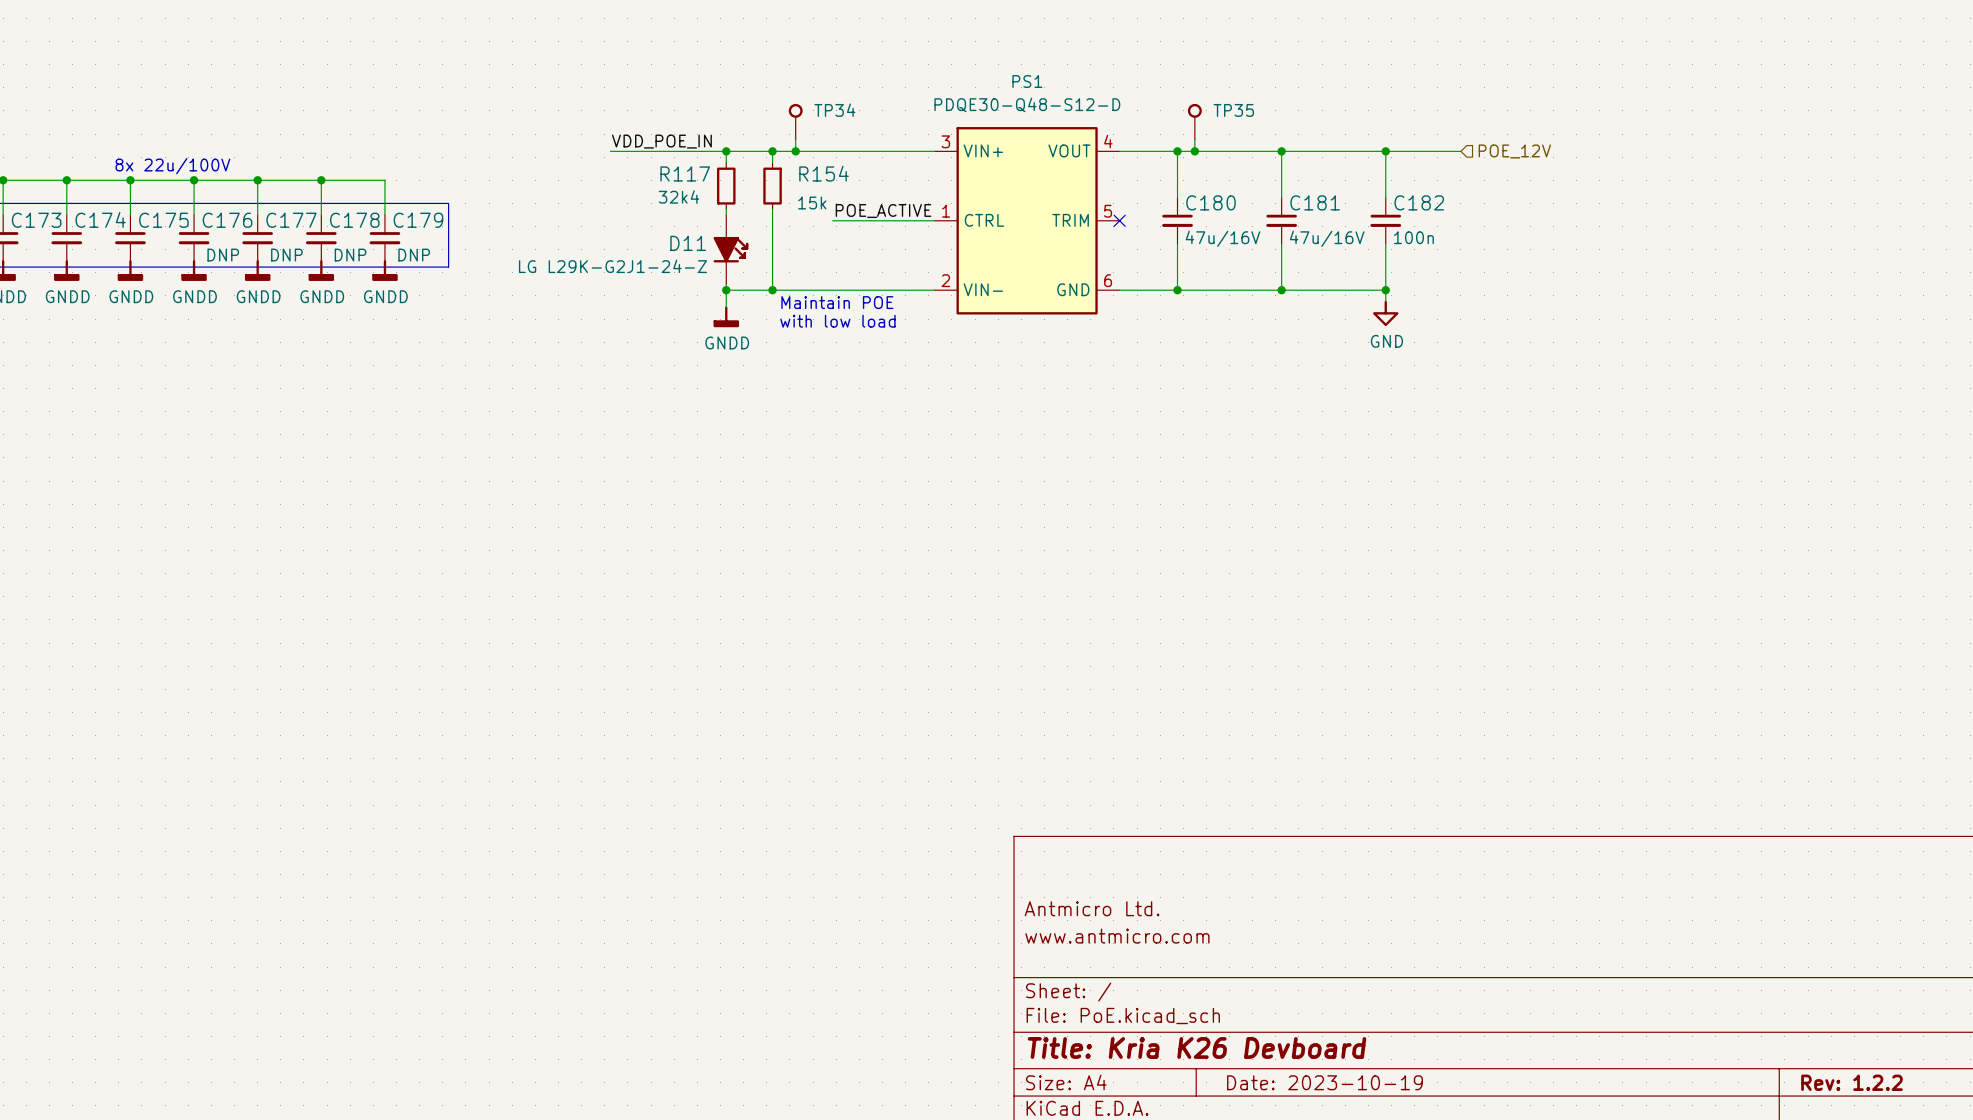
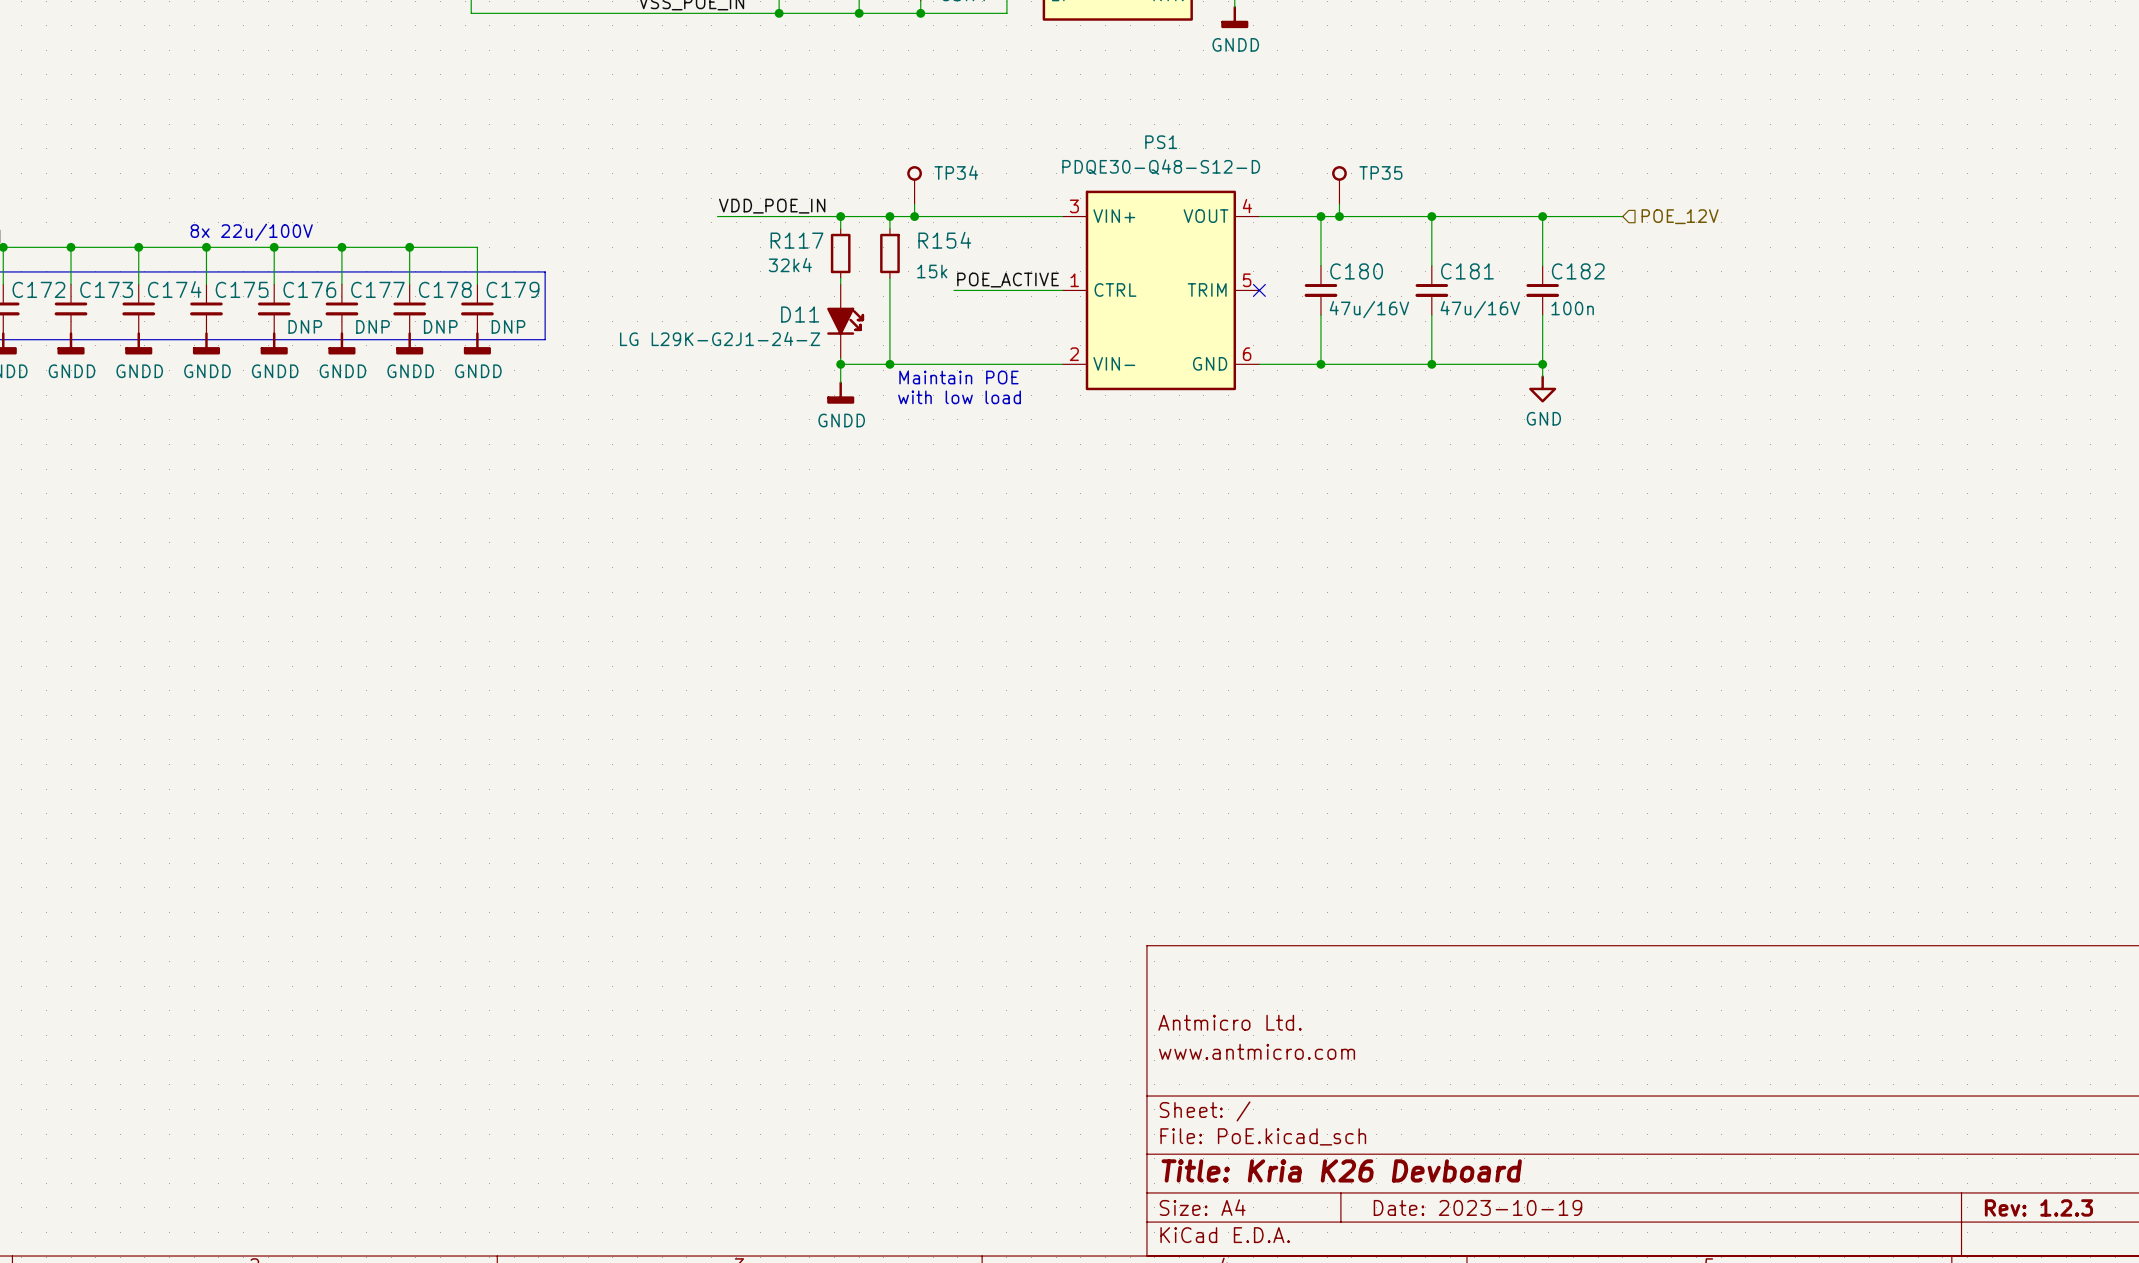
title block: Rev: 1.2.2 (1852, 1082) -> Rev: 1.2.3 (2038, 1207)

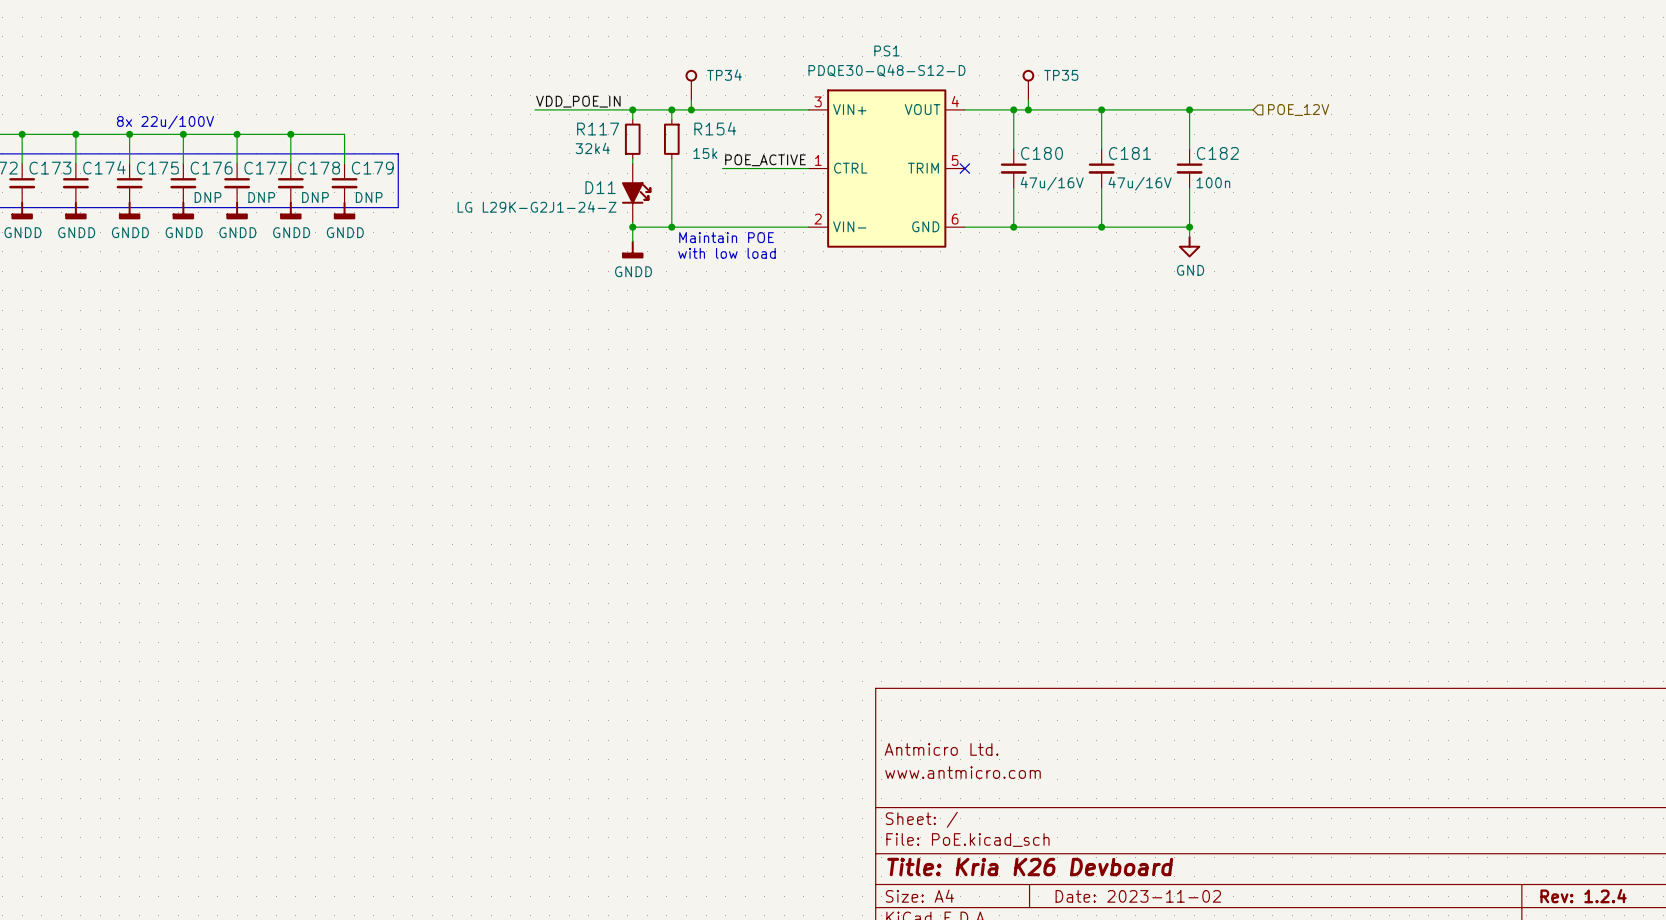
title block: Date: 2023-10-19 (1477, 1207) -> Date: 2023-11-02 (1138, 896)
title block: Rev: 1.2.3 (2038, 1207) -> Rev: 1.2.4 (1583, 896)

